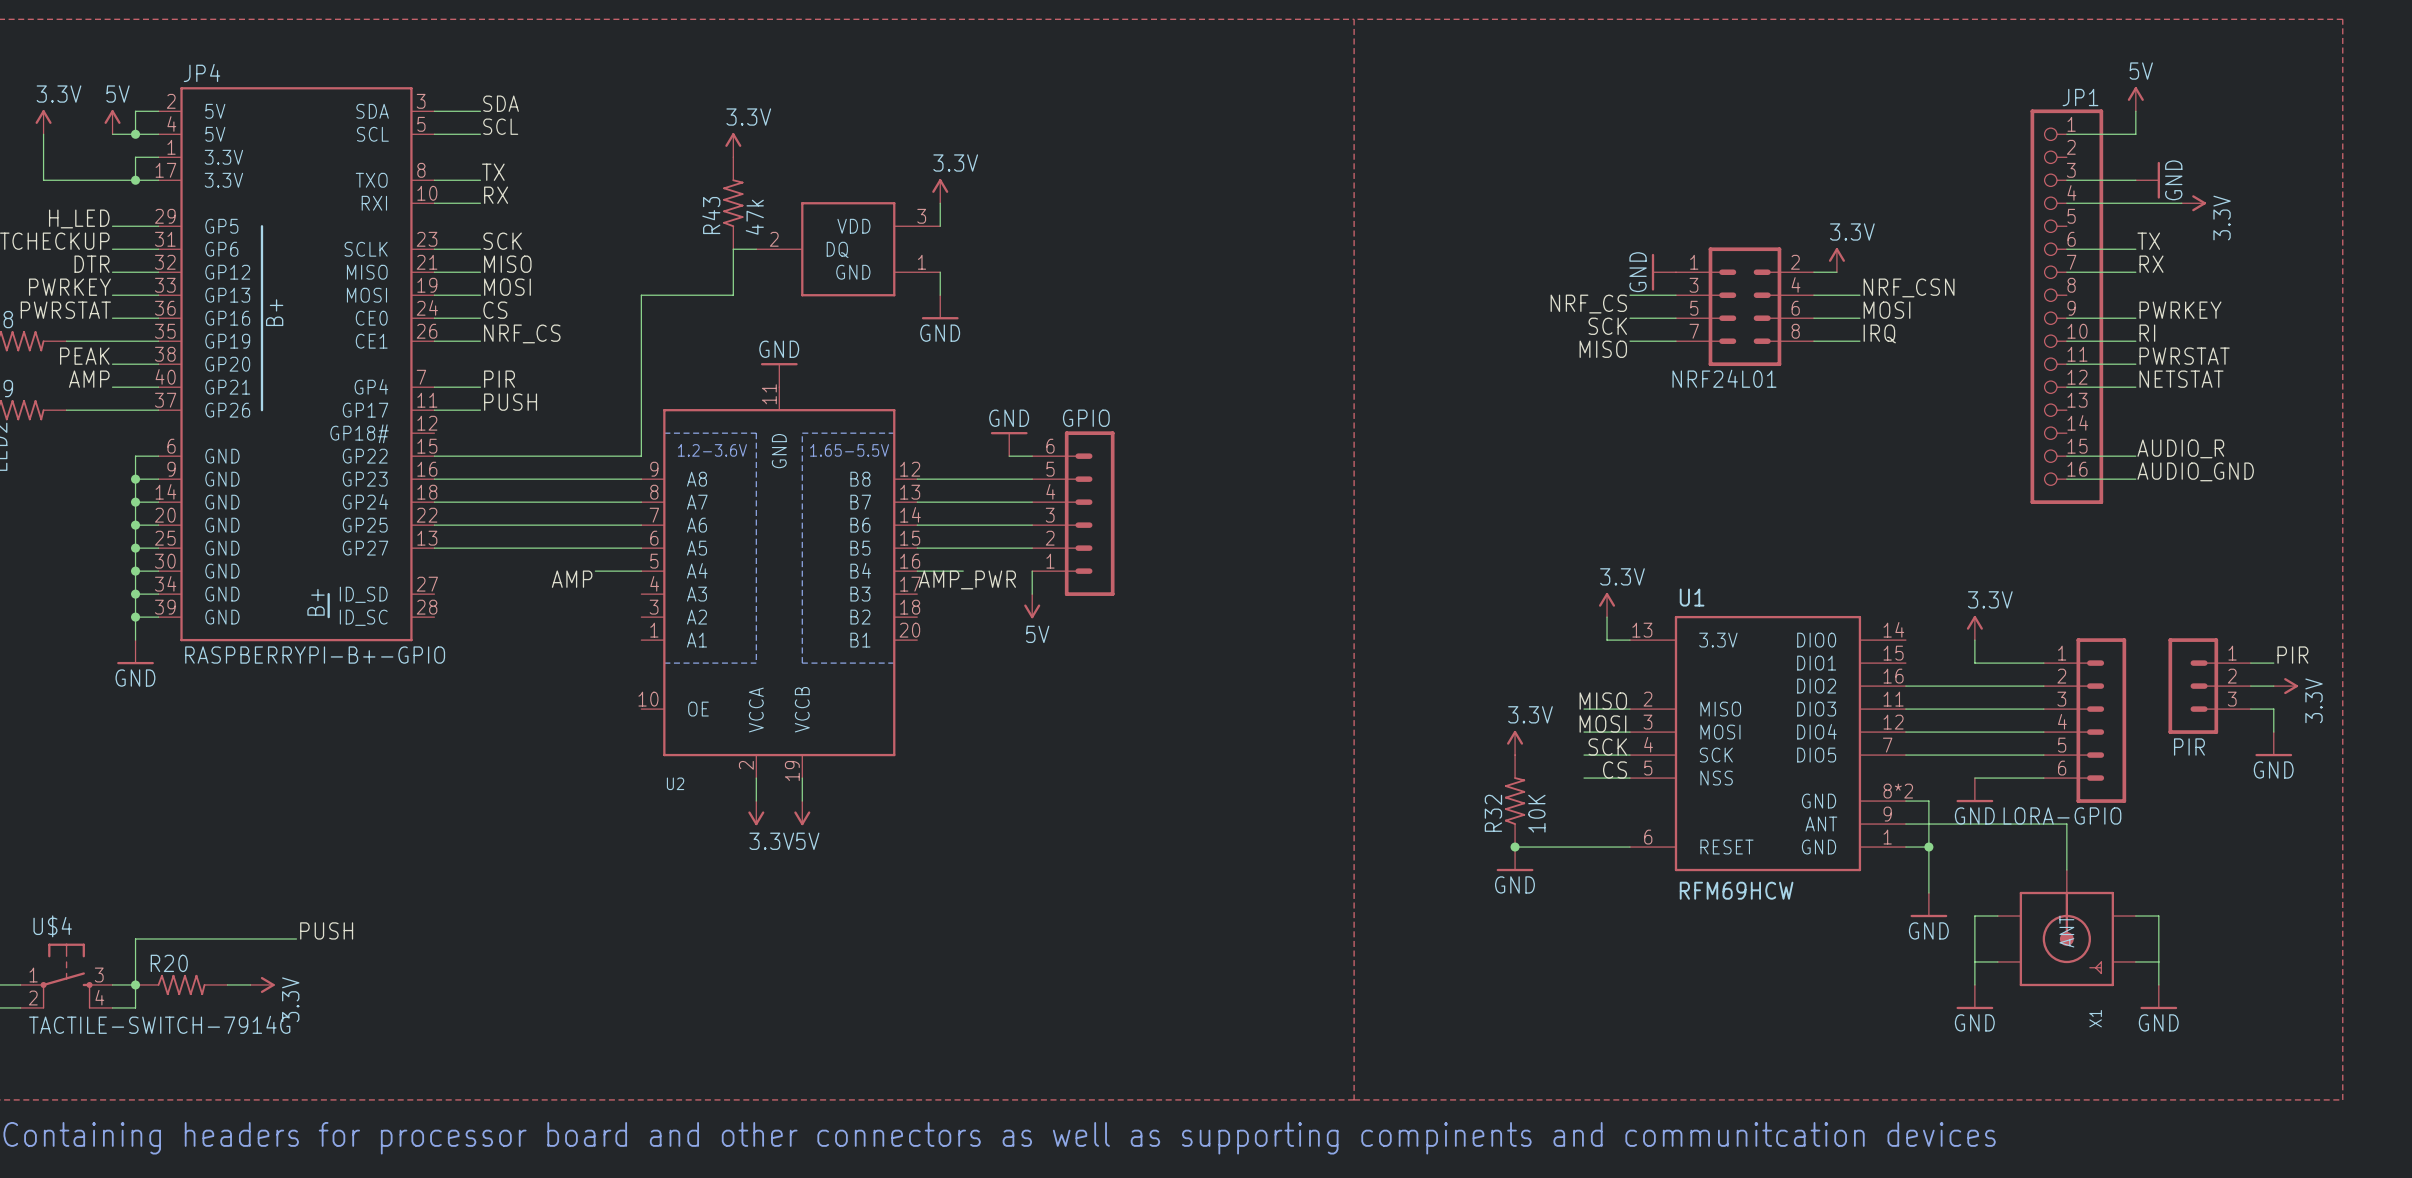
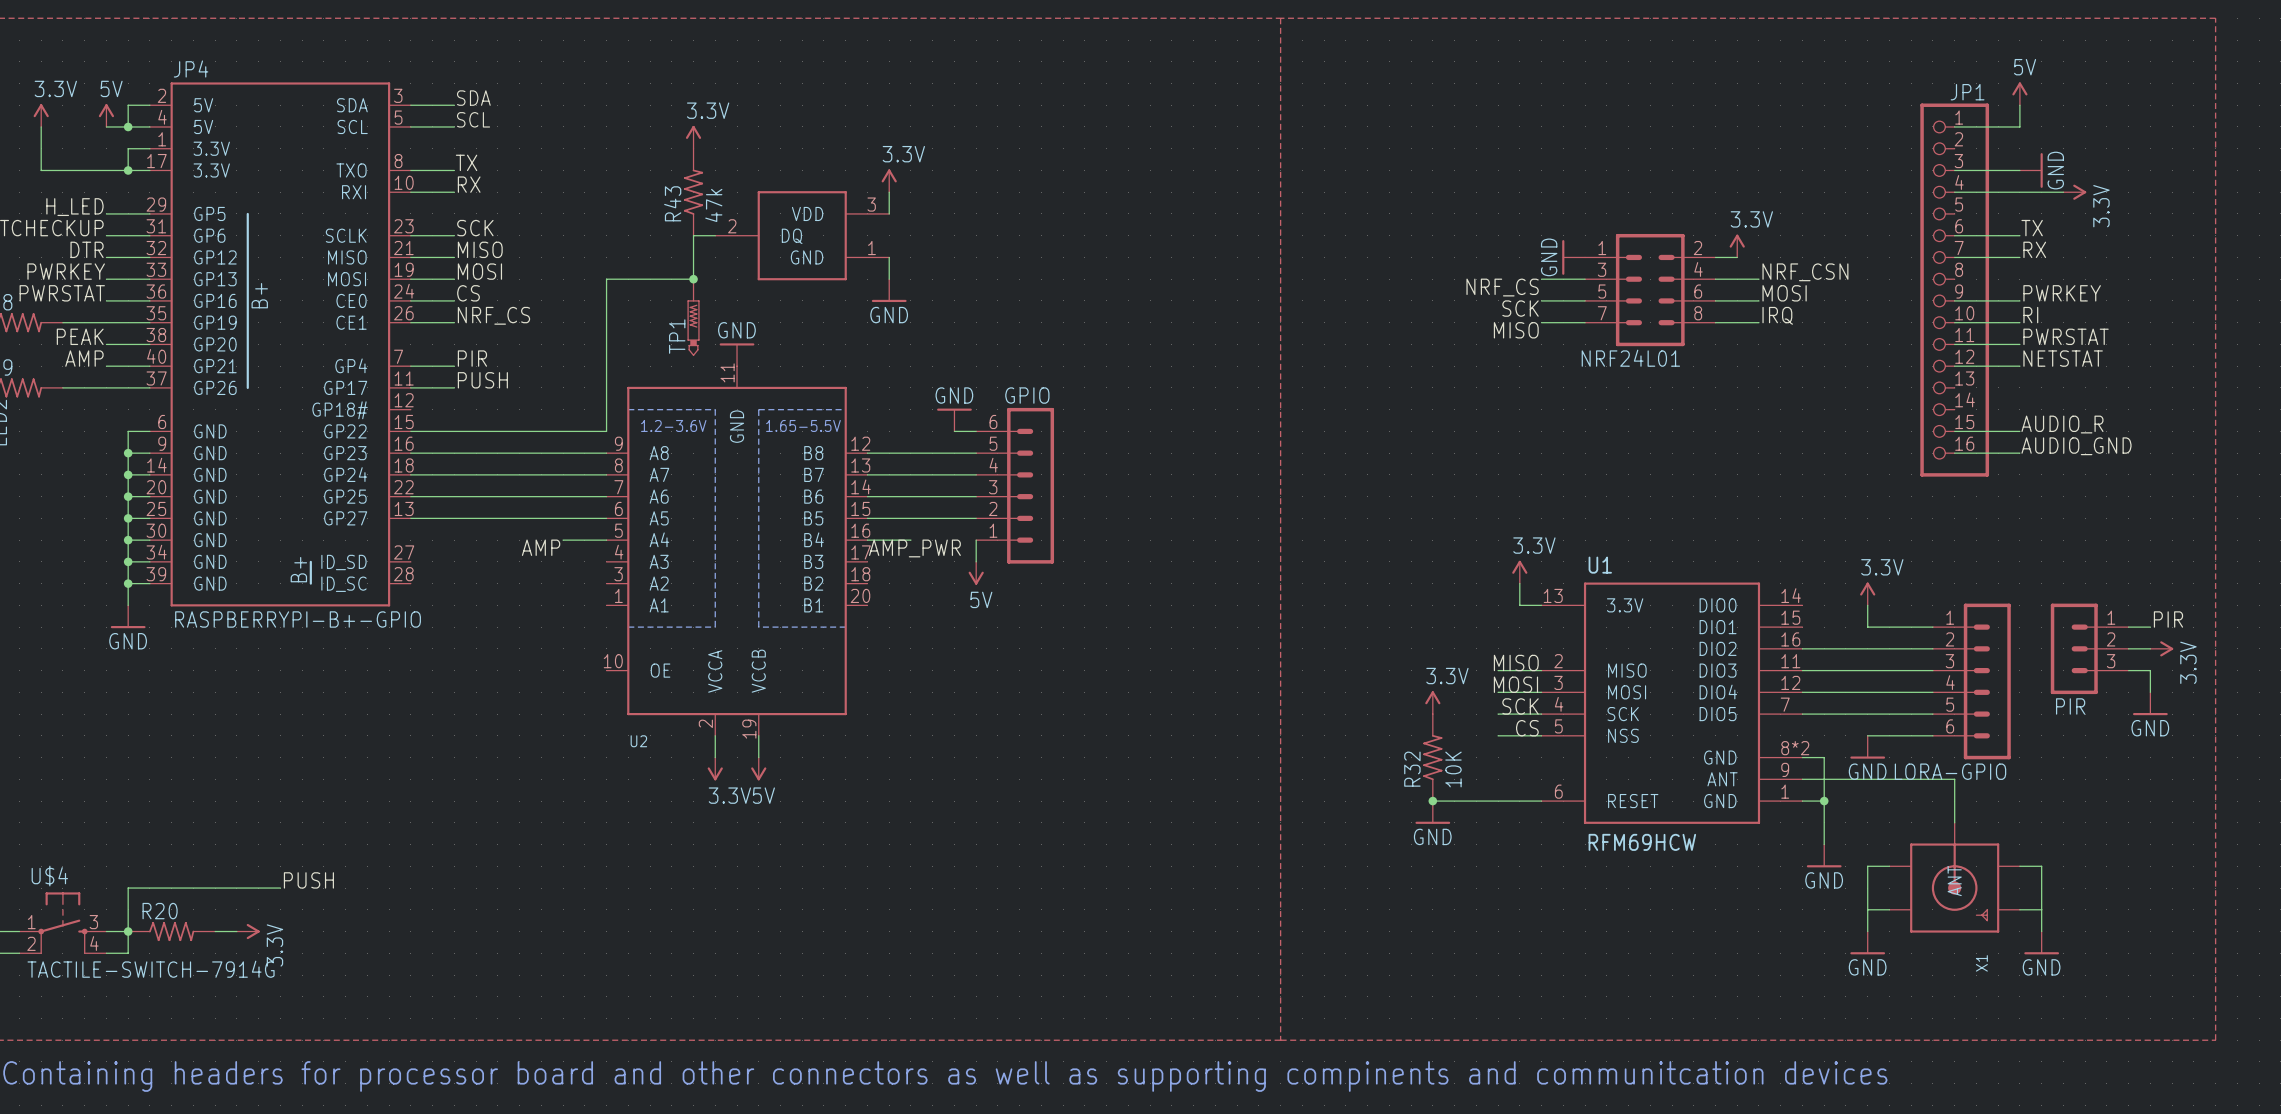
junction: none -> (693, 279)
TP1: none -> (693, 317)

